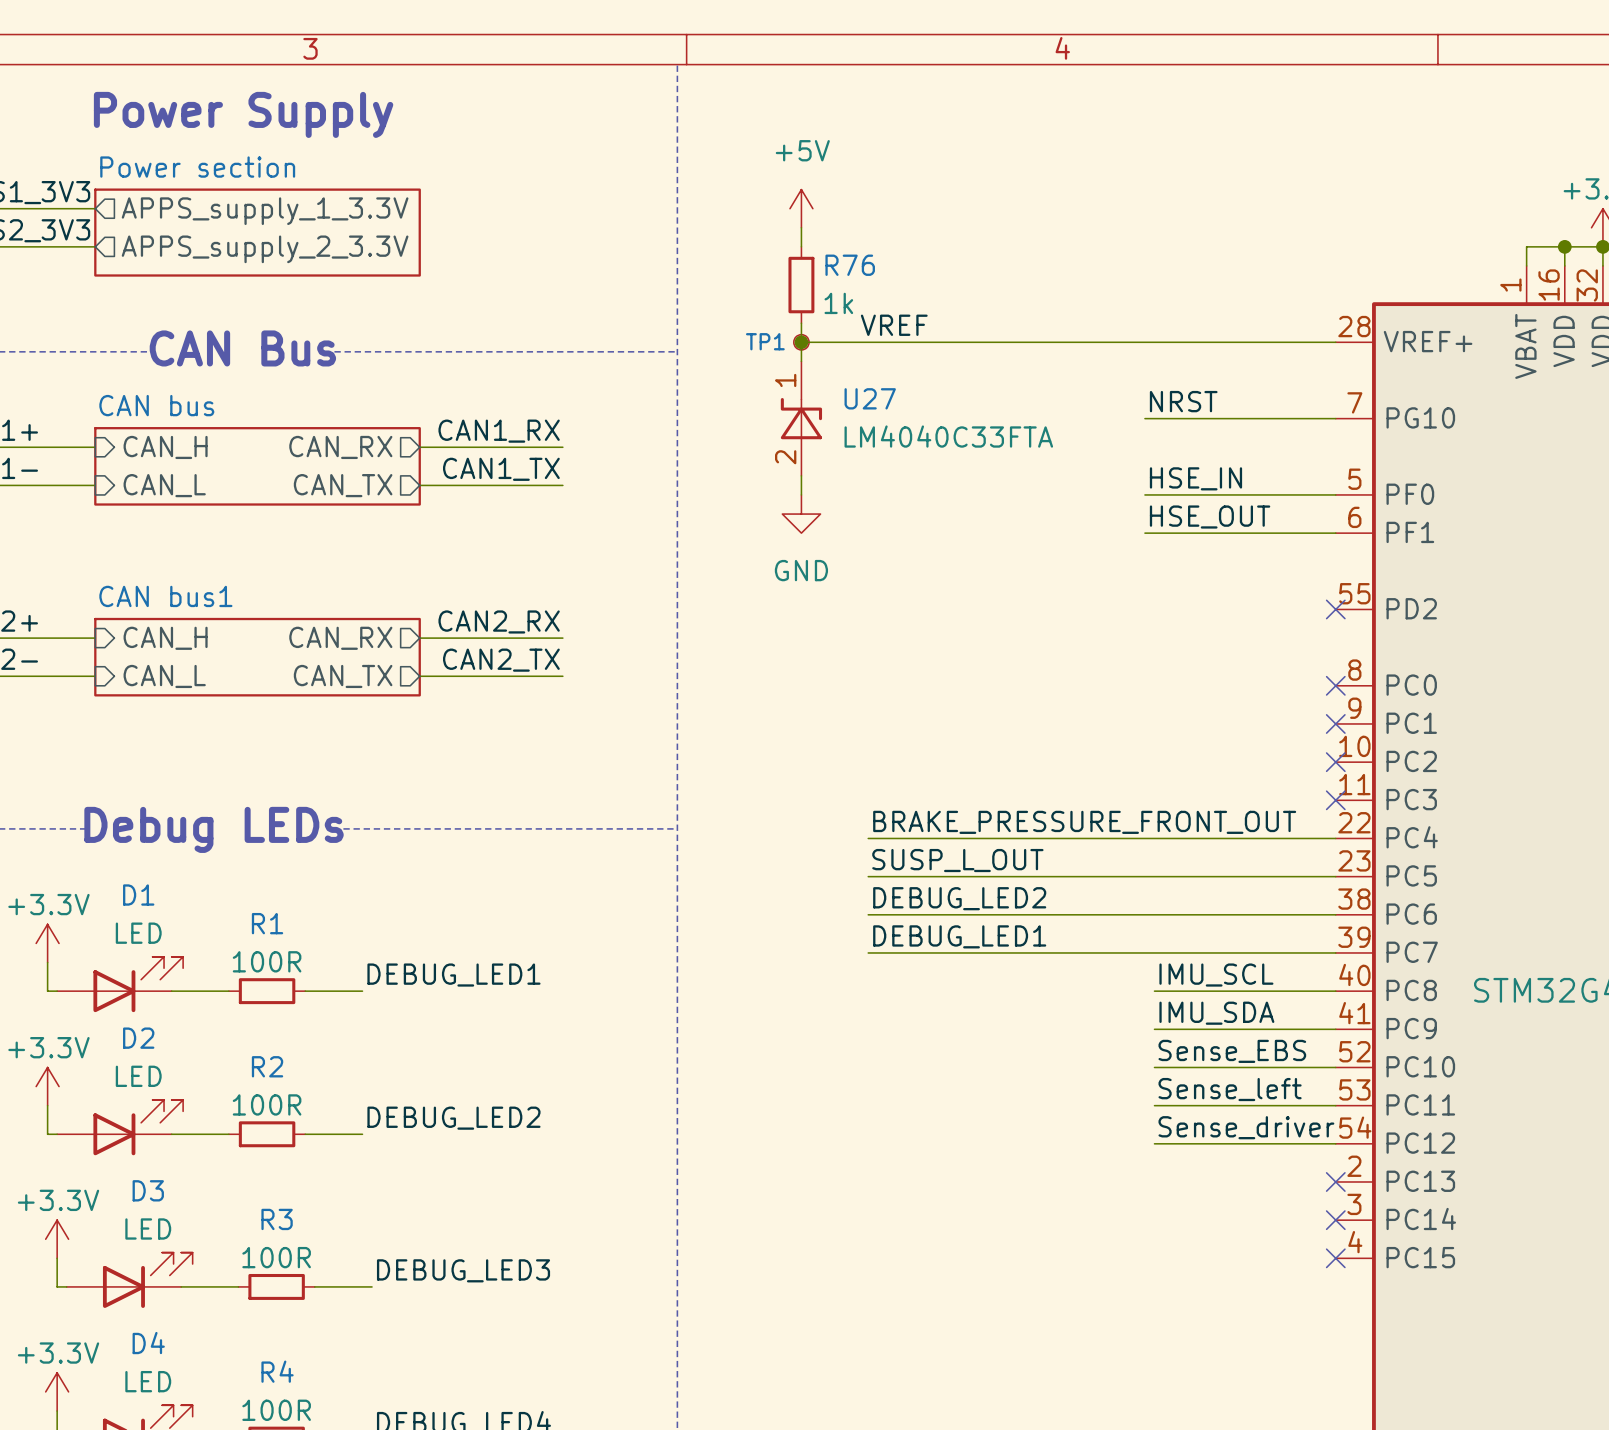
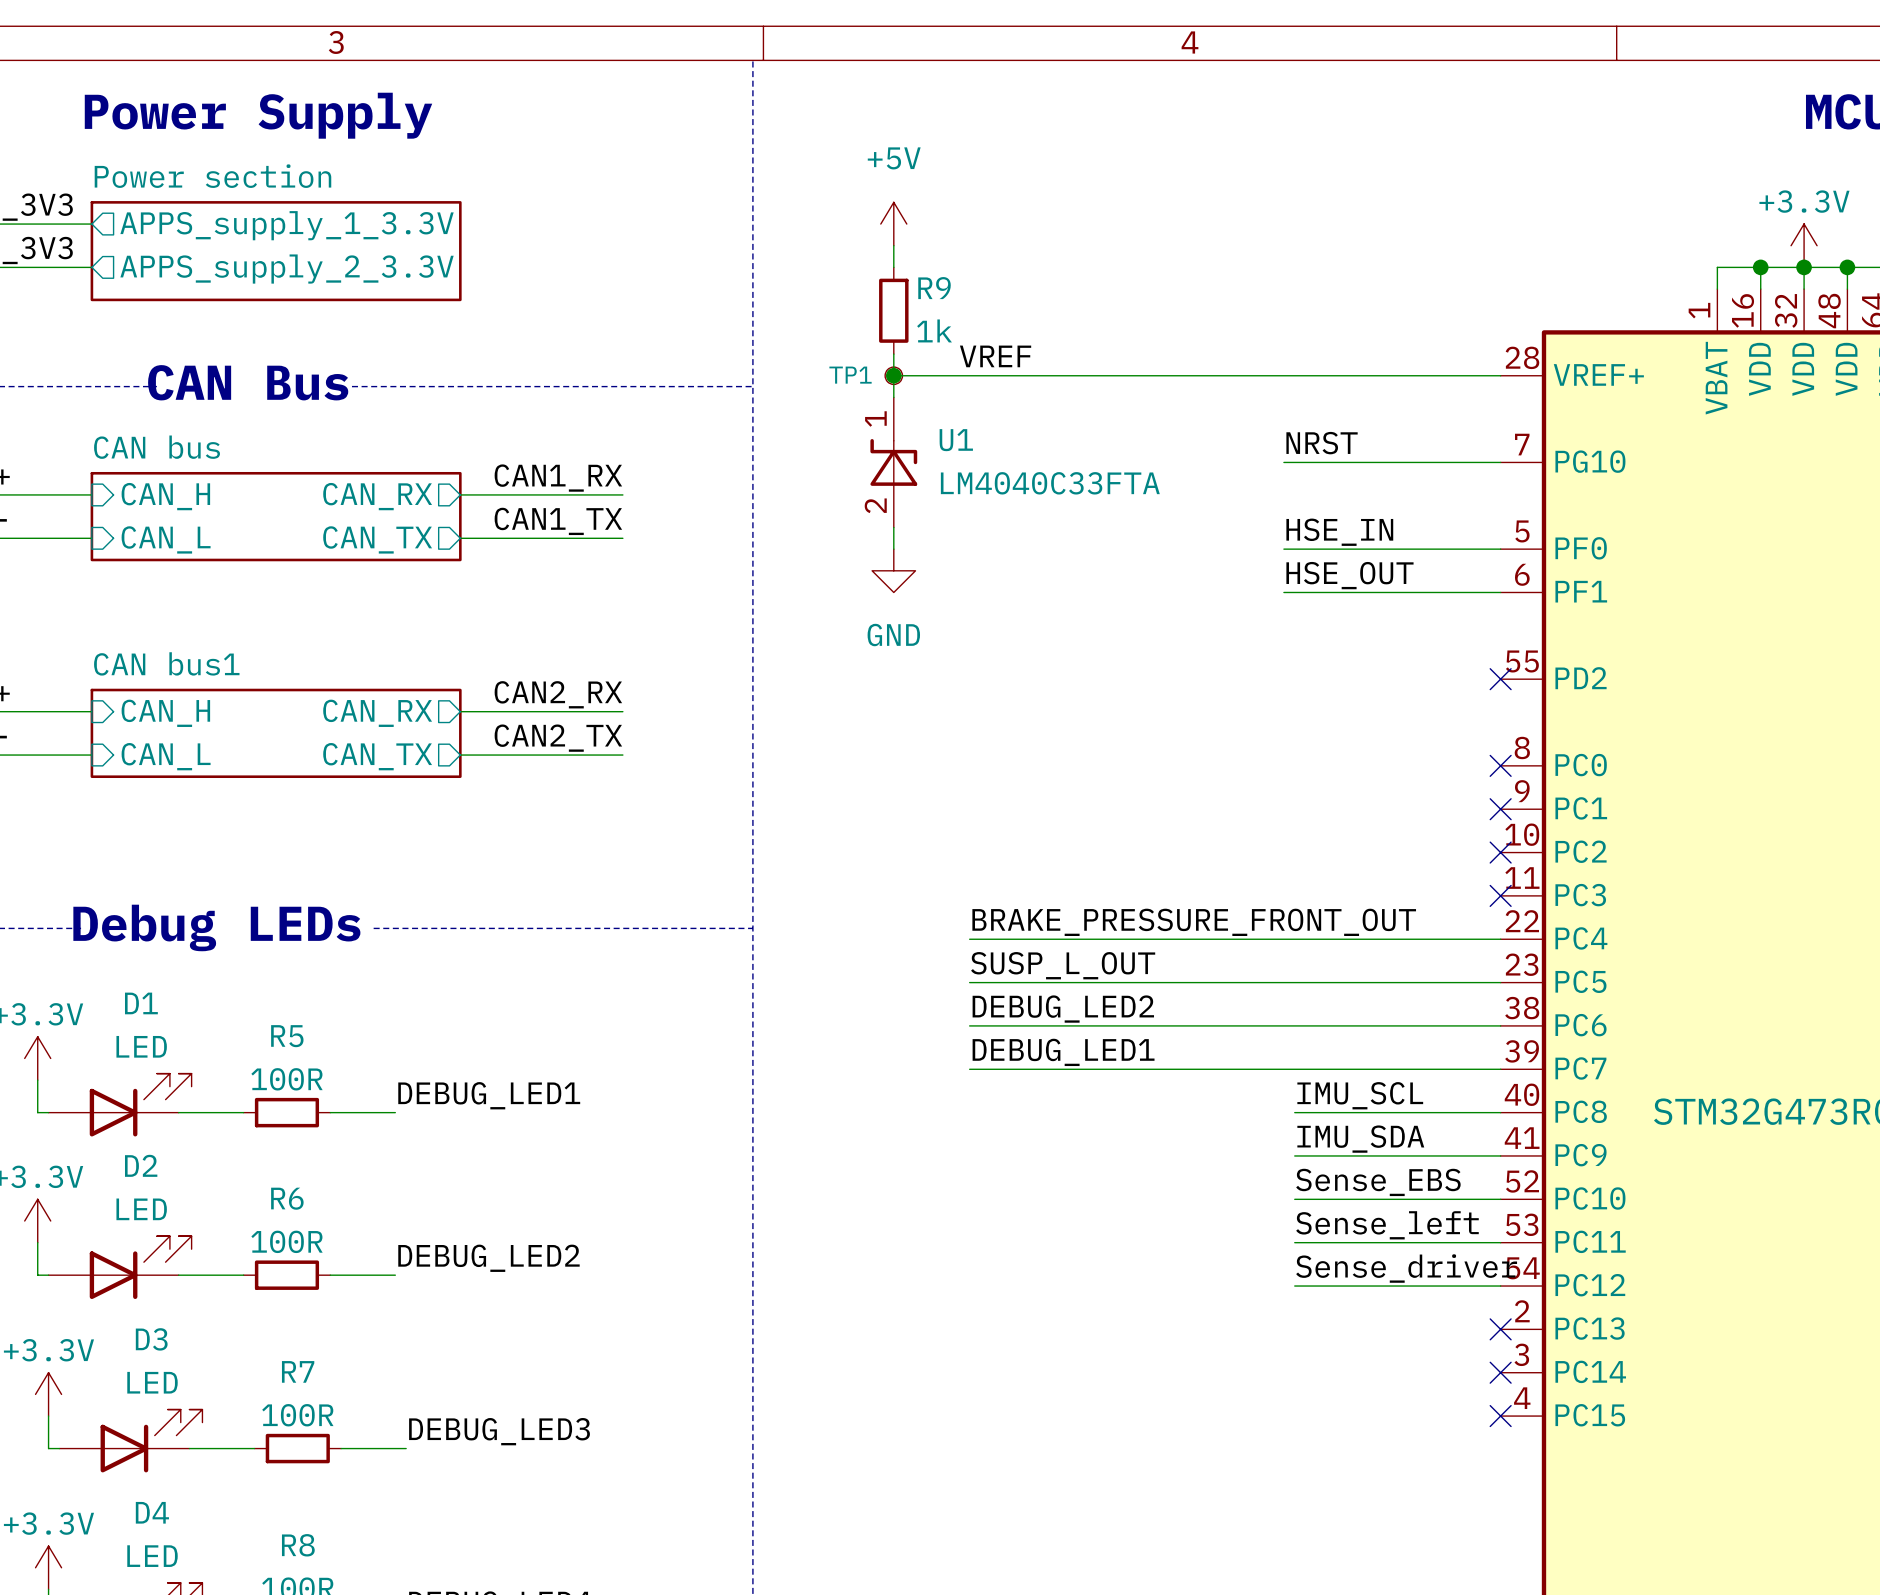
R76 name: R76 (850, 265) -> R9 (934, 288)
U27 name: U27 (870, 398) -> U1 (956, 440)
R1 name: R1 (267, 923) -> R5 (287, 1036)
R2 name: R2 (267, 1066) -> R6 (287, 1198)
R3 name: R3 (277, 1219) -> R7 (298, 1371)
R4 name: R4 (277, 1371) -> R8 (298, 1545)

